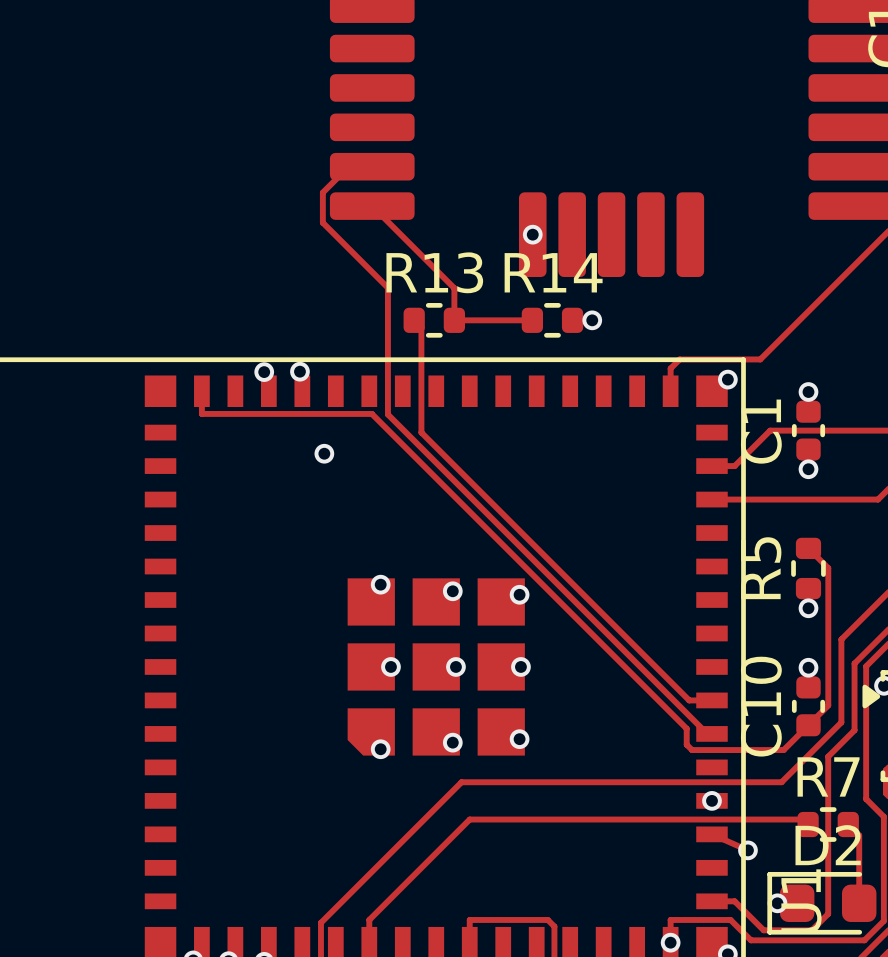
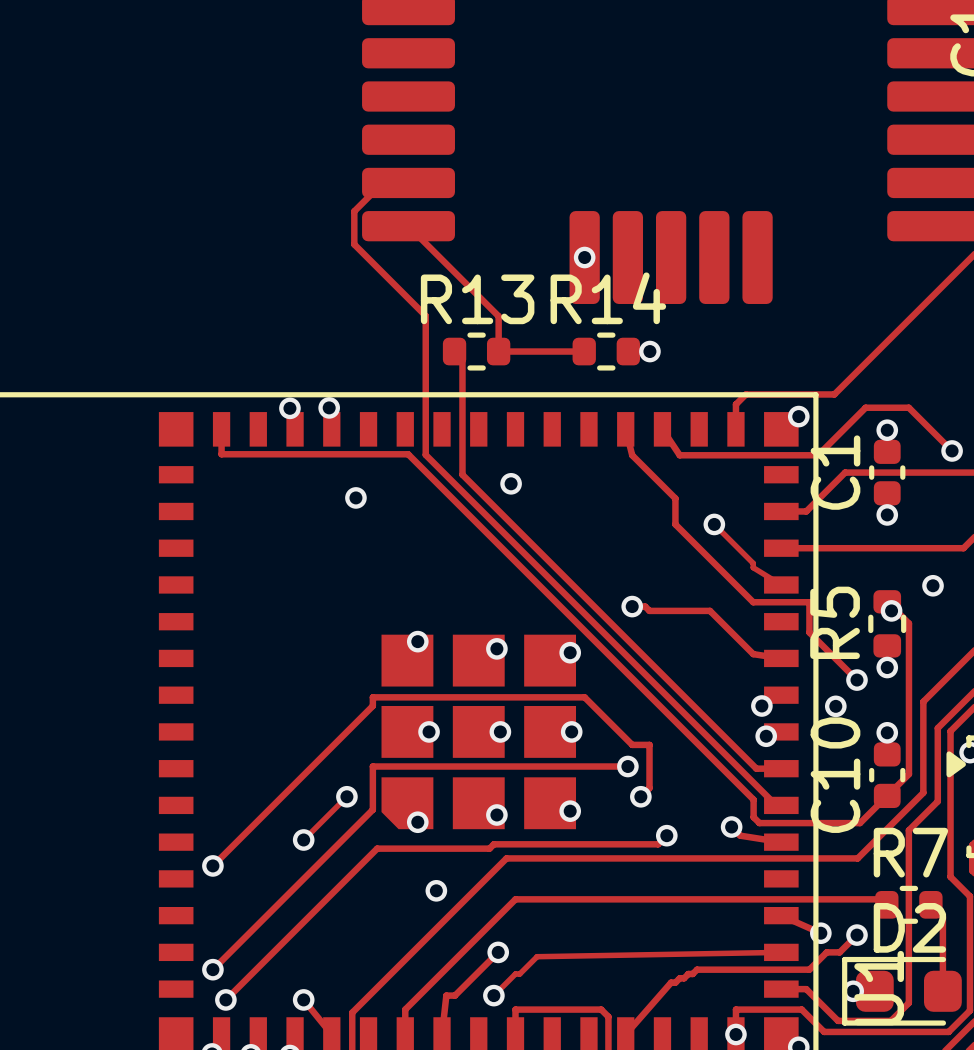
track: none -> (625, 429) (632, 455) (675, 498) (675, 524) (753, 602) (809, 602) (809, 632) (856, 680)
track: none -> (662, 429) (679, 455) (818, 455) (865, 407) (908, 407) (952, 450)
via: none -> (952, 450)
via: none -> (511, 483)
track: none -> (714, 524) (753, 563) (753, 567) (781, 584)
via: none -> (714, 524)
via: none -> (933, 585)
track: none -> (632, 606) (645, 606) (649, 610) (710, 610) (753, 654) (781, 658)
via: none -> (632, 606)
via: none -> (891, 610)
via: none -> (856, 680)
via: none -> (761, 705)
via: none -> (835, 706)
via: none -> (766, 736)
track: none -> (627, 766) (372, 766) (372, 809) (212, 969)
via: none -> (627, 766)
track: none -> (346, 796) (303, 839)
via: none -> (346, 796)
track: none -> (640, 796) (649, 788) (649, 744) (632, 744) (584, 697) (372, 697) (372, 705) (212, 865)
via: none -> (640, 796)
track: none -> (731, 827) (740, 835) (781, 842)
via: none -> (731, 827)
track: none -> (666, 835) (658, 844) (493, 844) (489, 848) (377, 848) (225, 999)
via: none -> (666, 835)
via: none -> (303, 839)
via: none -> (212, 865)
via: (711, 800) -> none
via: none -> (436, 890)
track: none -> (856, 935) (839, 952) (826, 952) (809, 969) (697, 969) (692, 973) (688, 973) (675, 982) (671, 982) (625, 1034)
via: none -> (856, 935)
track: none -> (498, 952) (454, 995) (446, 995) (442, 1034)
via: none -> (498, 952)
track: none -> (781, 952) (537, 956) (519, 973) (515, 973) (493, 995)
via: none -> (212, 969)
via: none -> (493, 995)
via: none -> (225, 999)
track: none -> (303, 999) (331, 1034)
via: none -> (303, 999)

